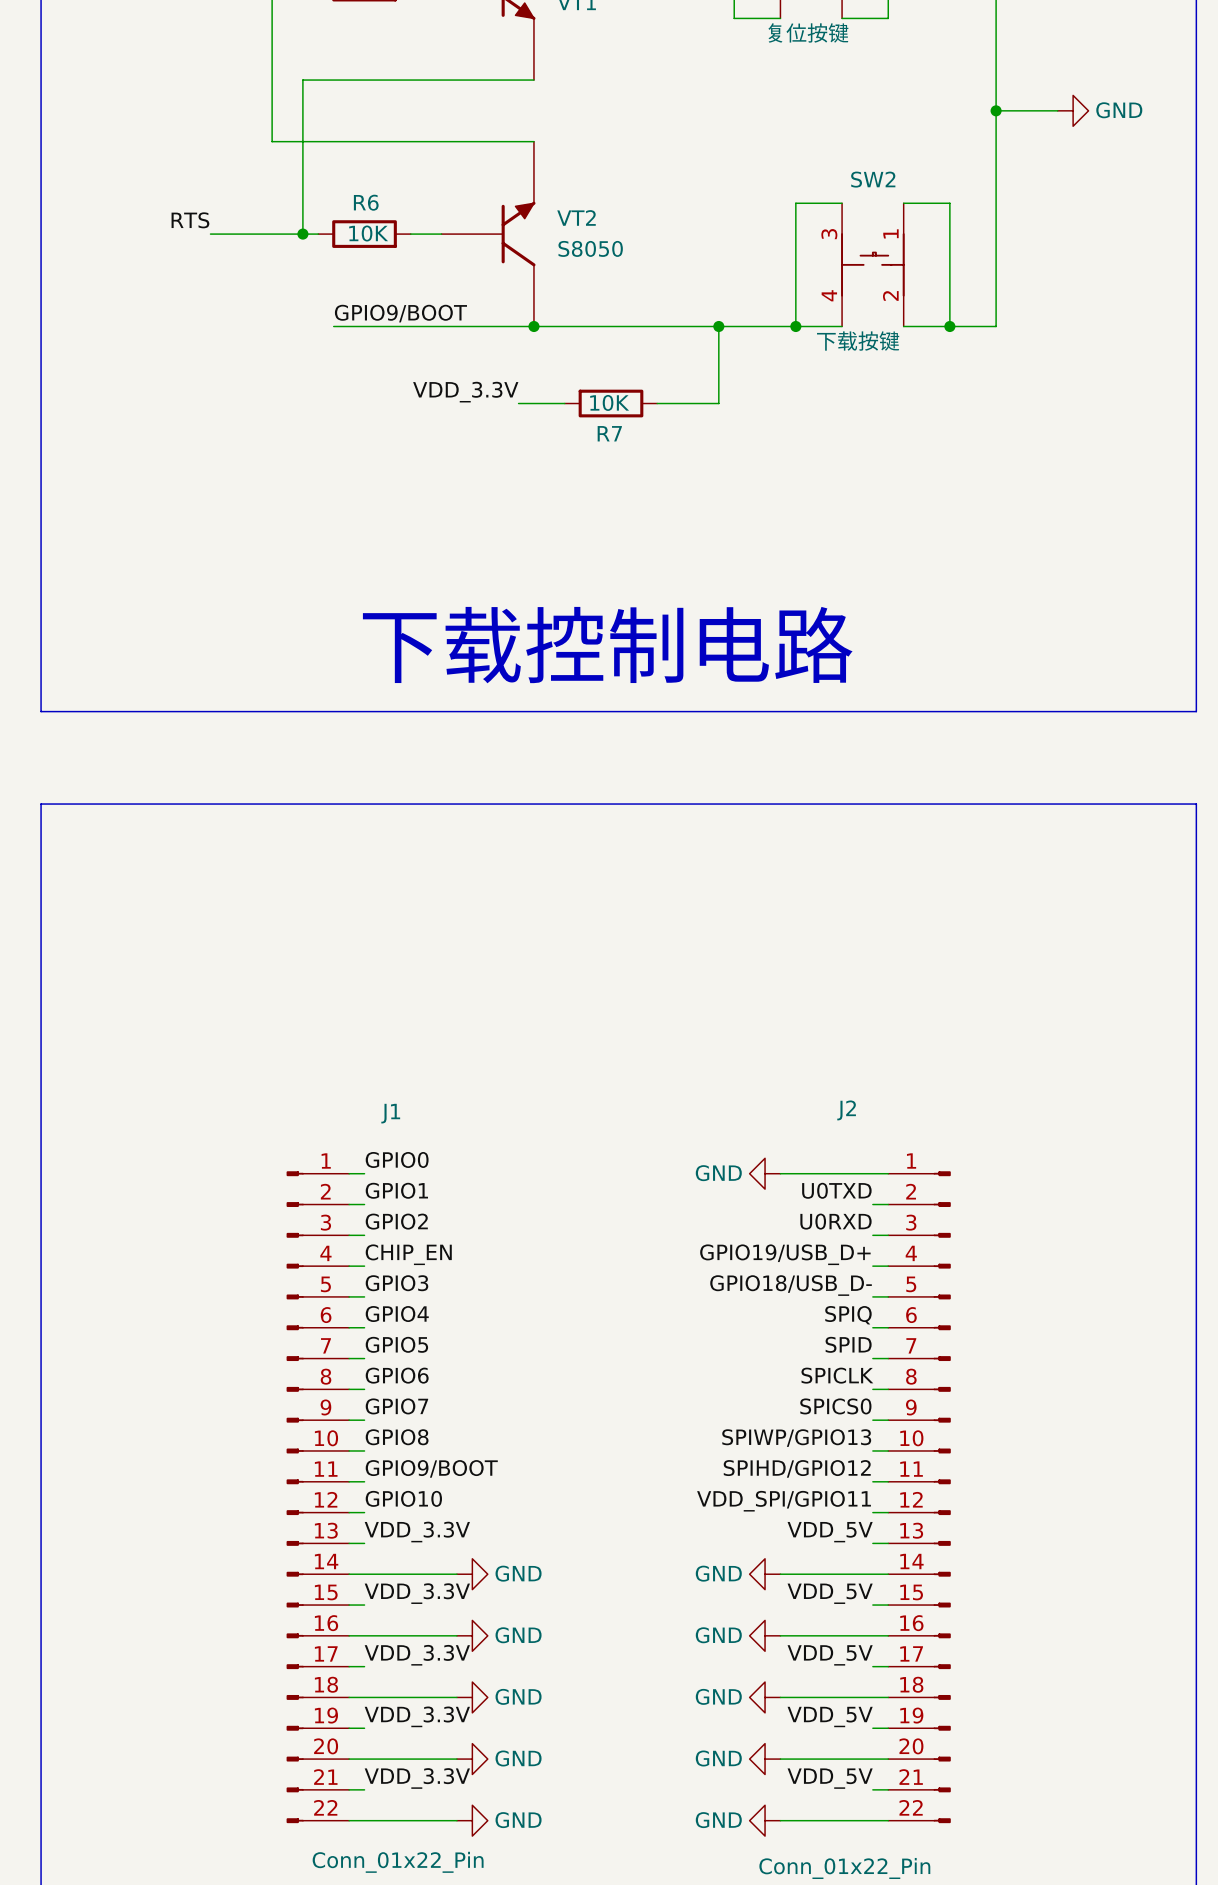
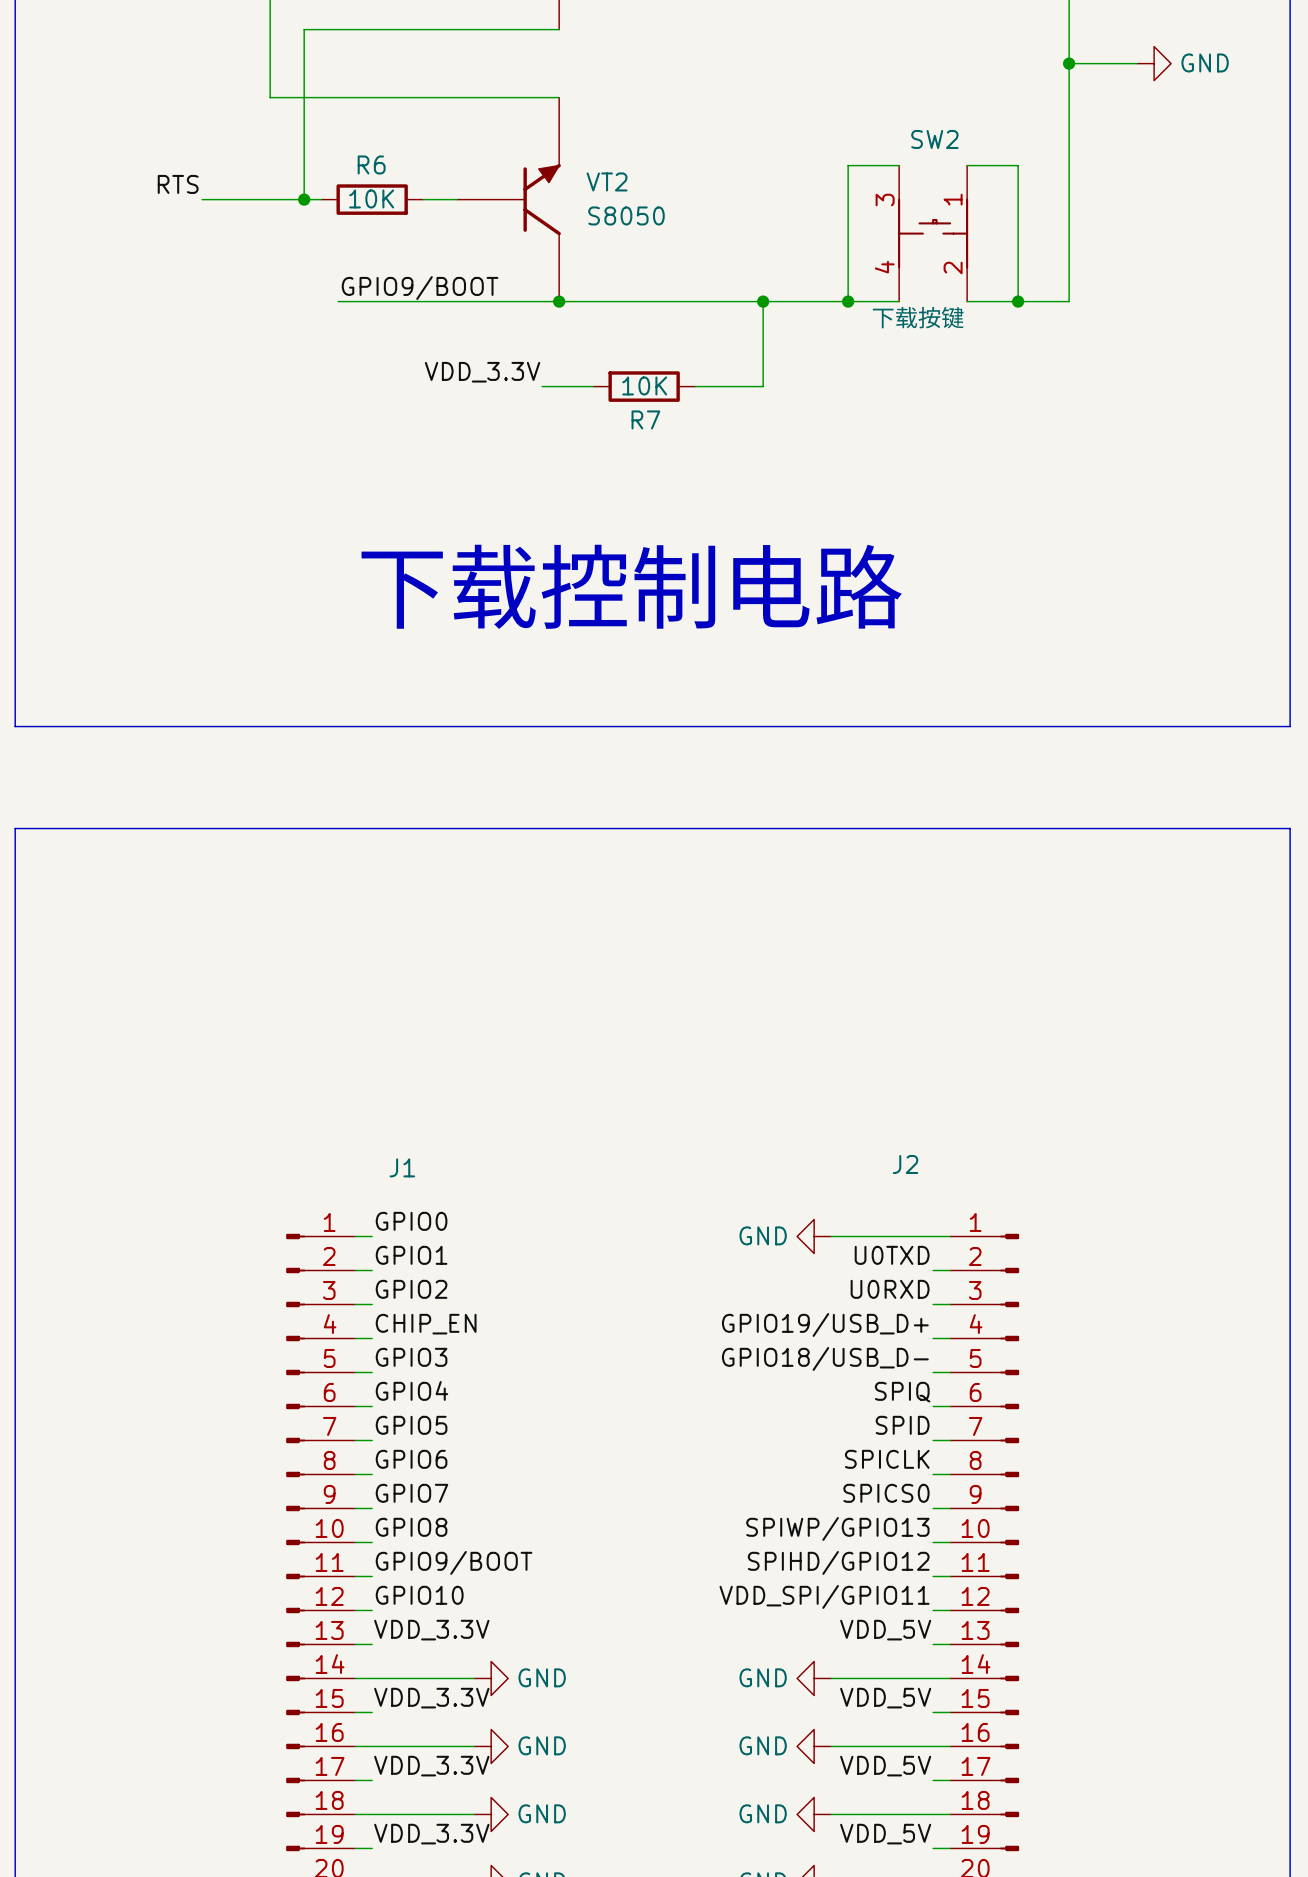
text position: 下载控制电路 (607, 645) -> 下载控制电路 (631, 586)

